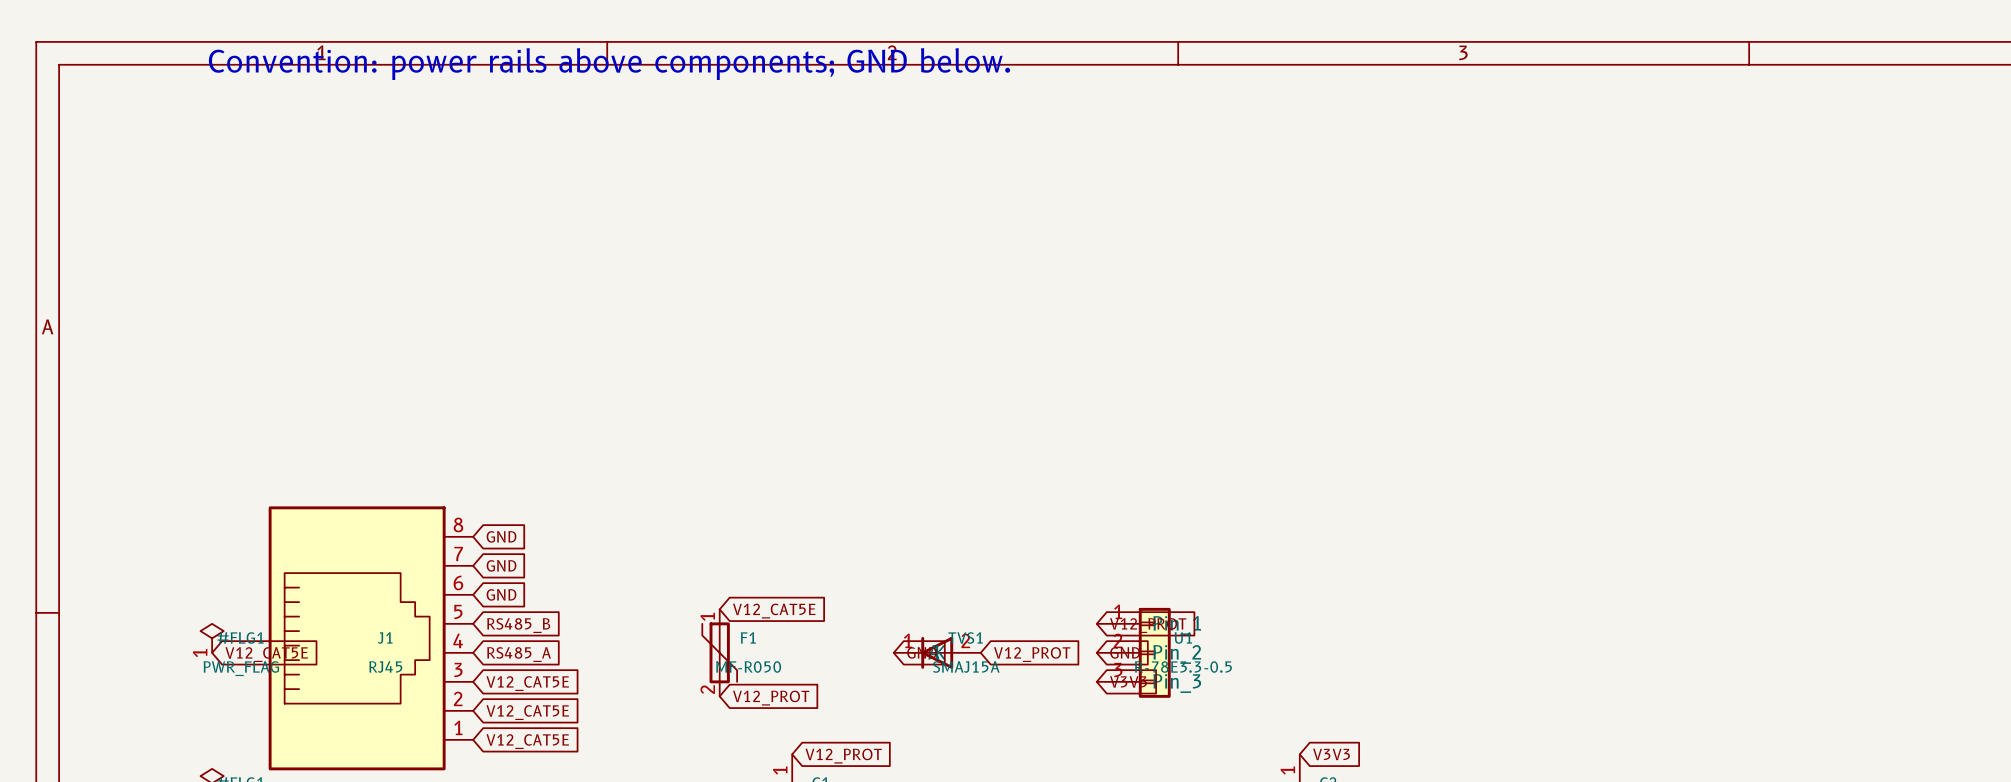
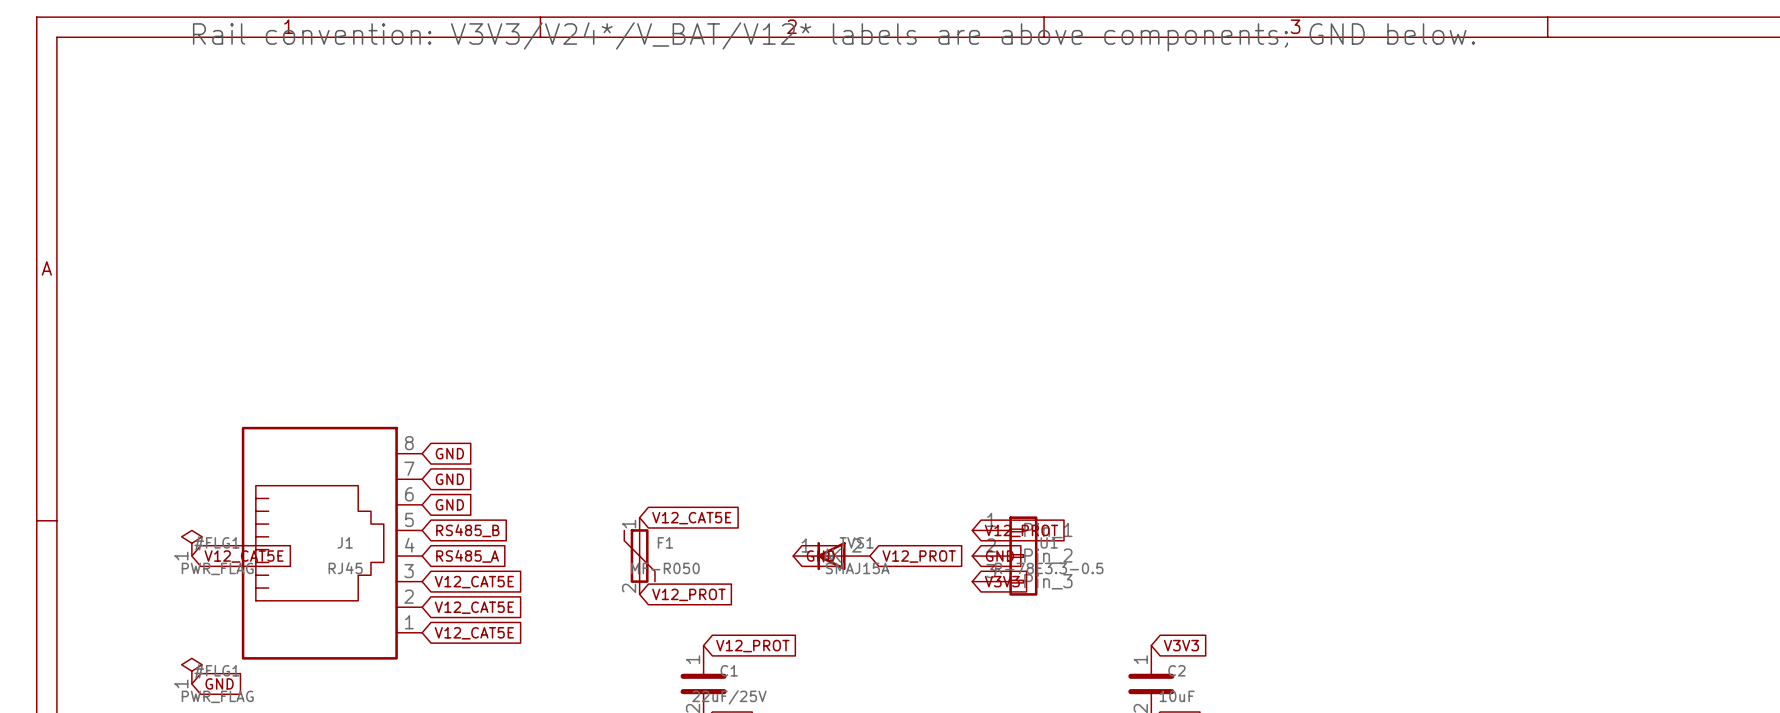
text: Convention: power rails above components; GND below. (609, 64) -> Rail convention: V3V3/V24*/V_BAT/V12* labels are above components; GND below. (834, 36)

